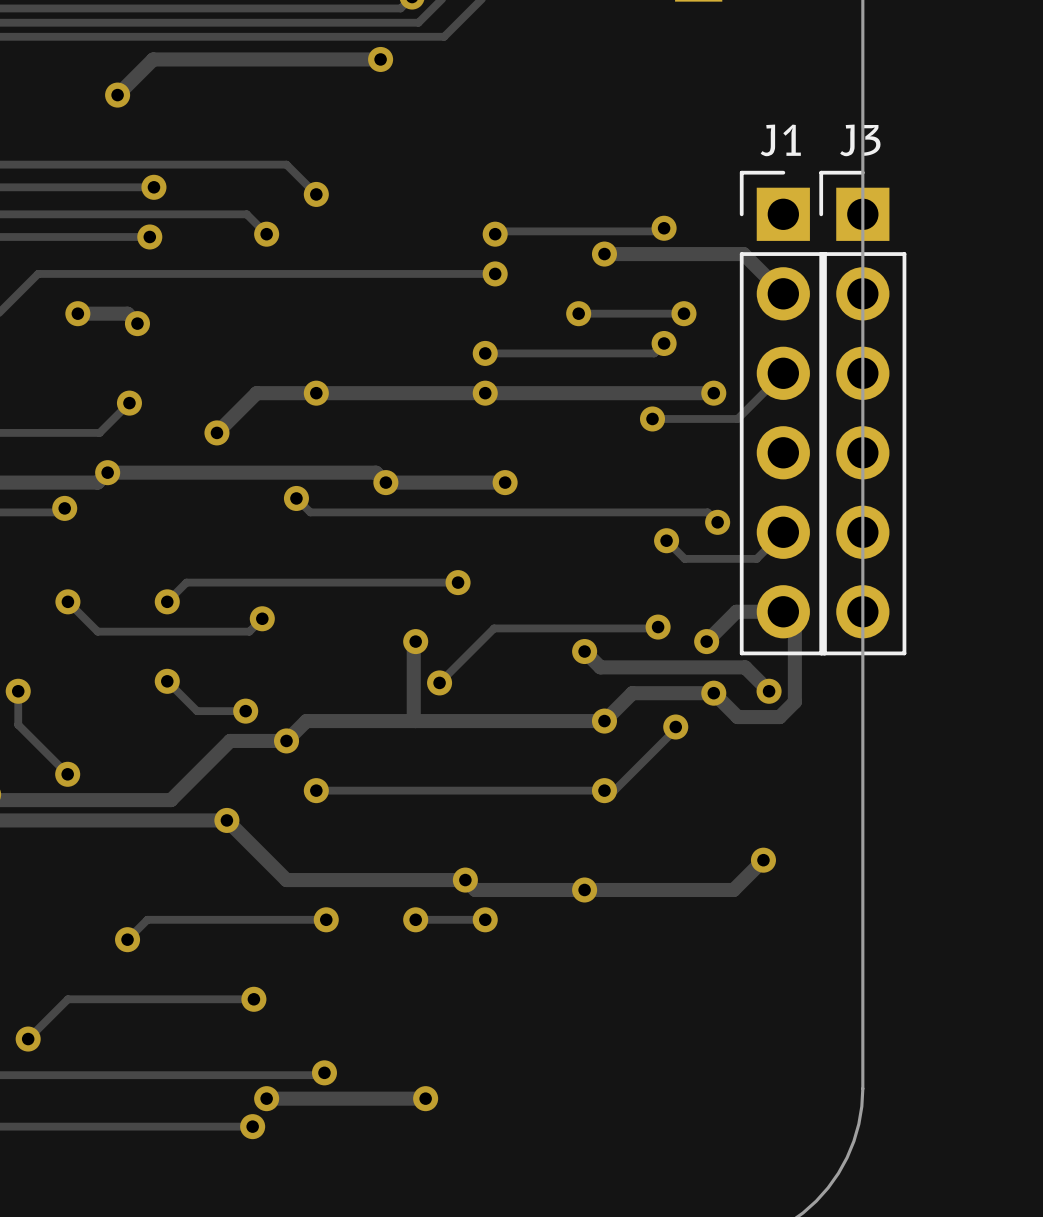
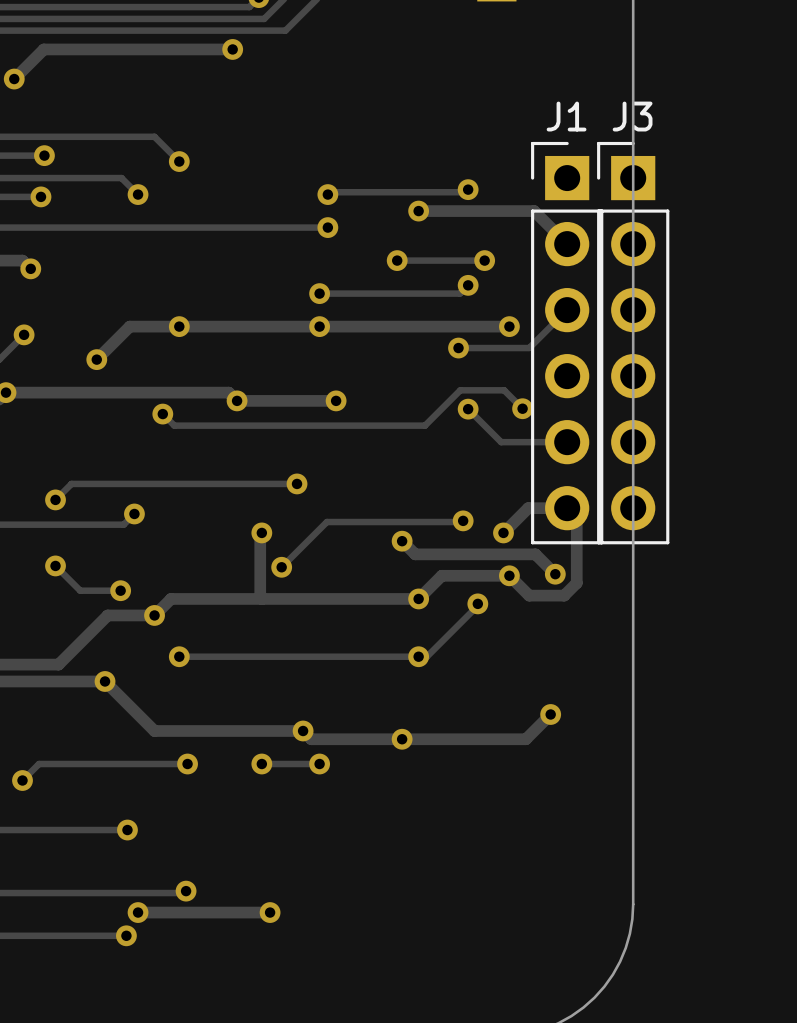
via: none -> (468, 409)
via: none -> (522, 408)
track: (612, 512) (707, 512) (717, 522) -> (425, 425) (460, 390) (504, 390) (522, 408)
via: (717, 522) -> none
track: (783, 532) (756, 558) (684, 558) (666, 540) -> (567, 442) (501, 442) (468, 409)
via: (666, 540) -> none

